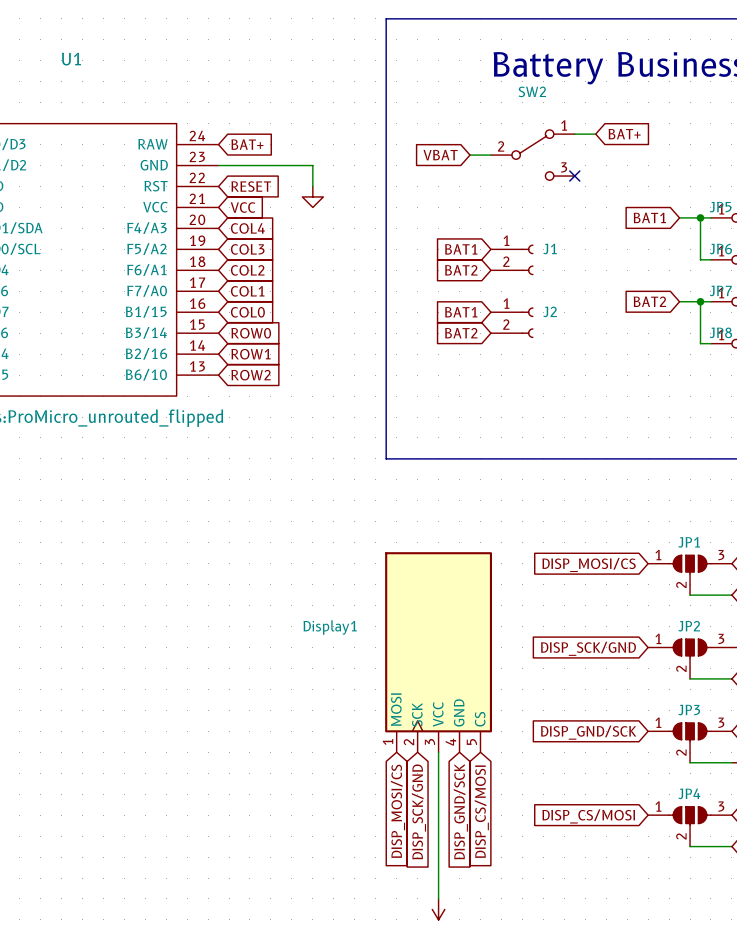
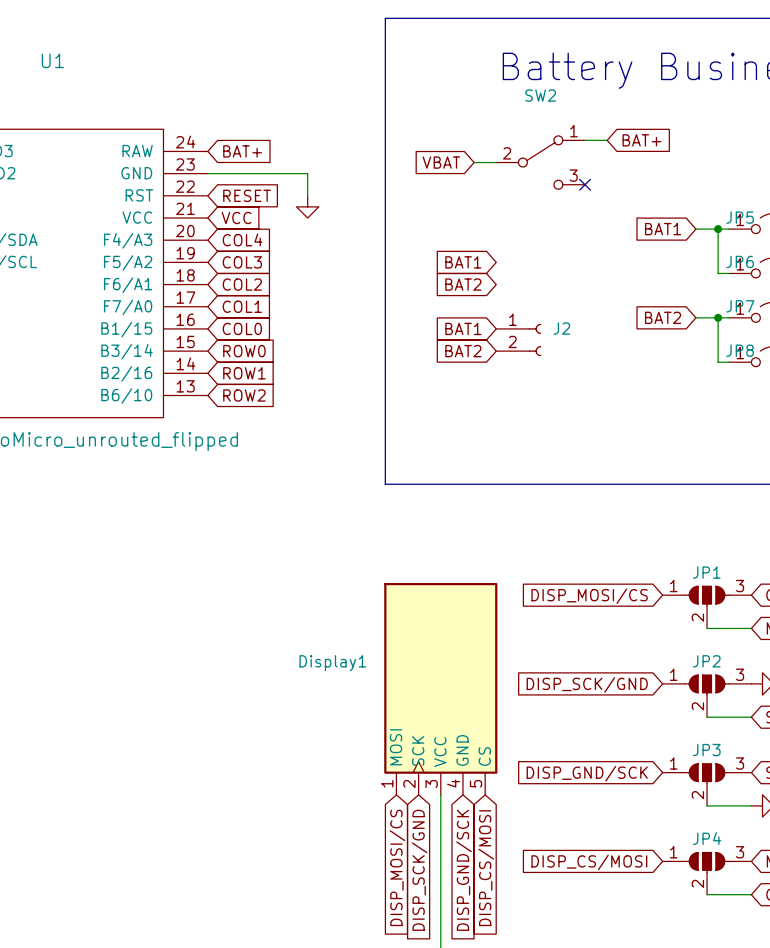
J1: (512, 259) -> none

